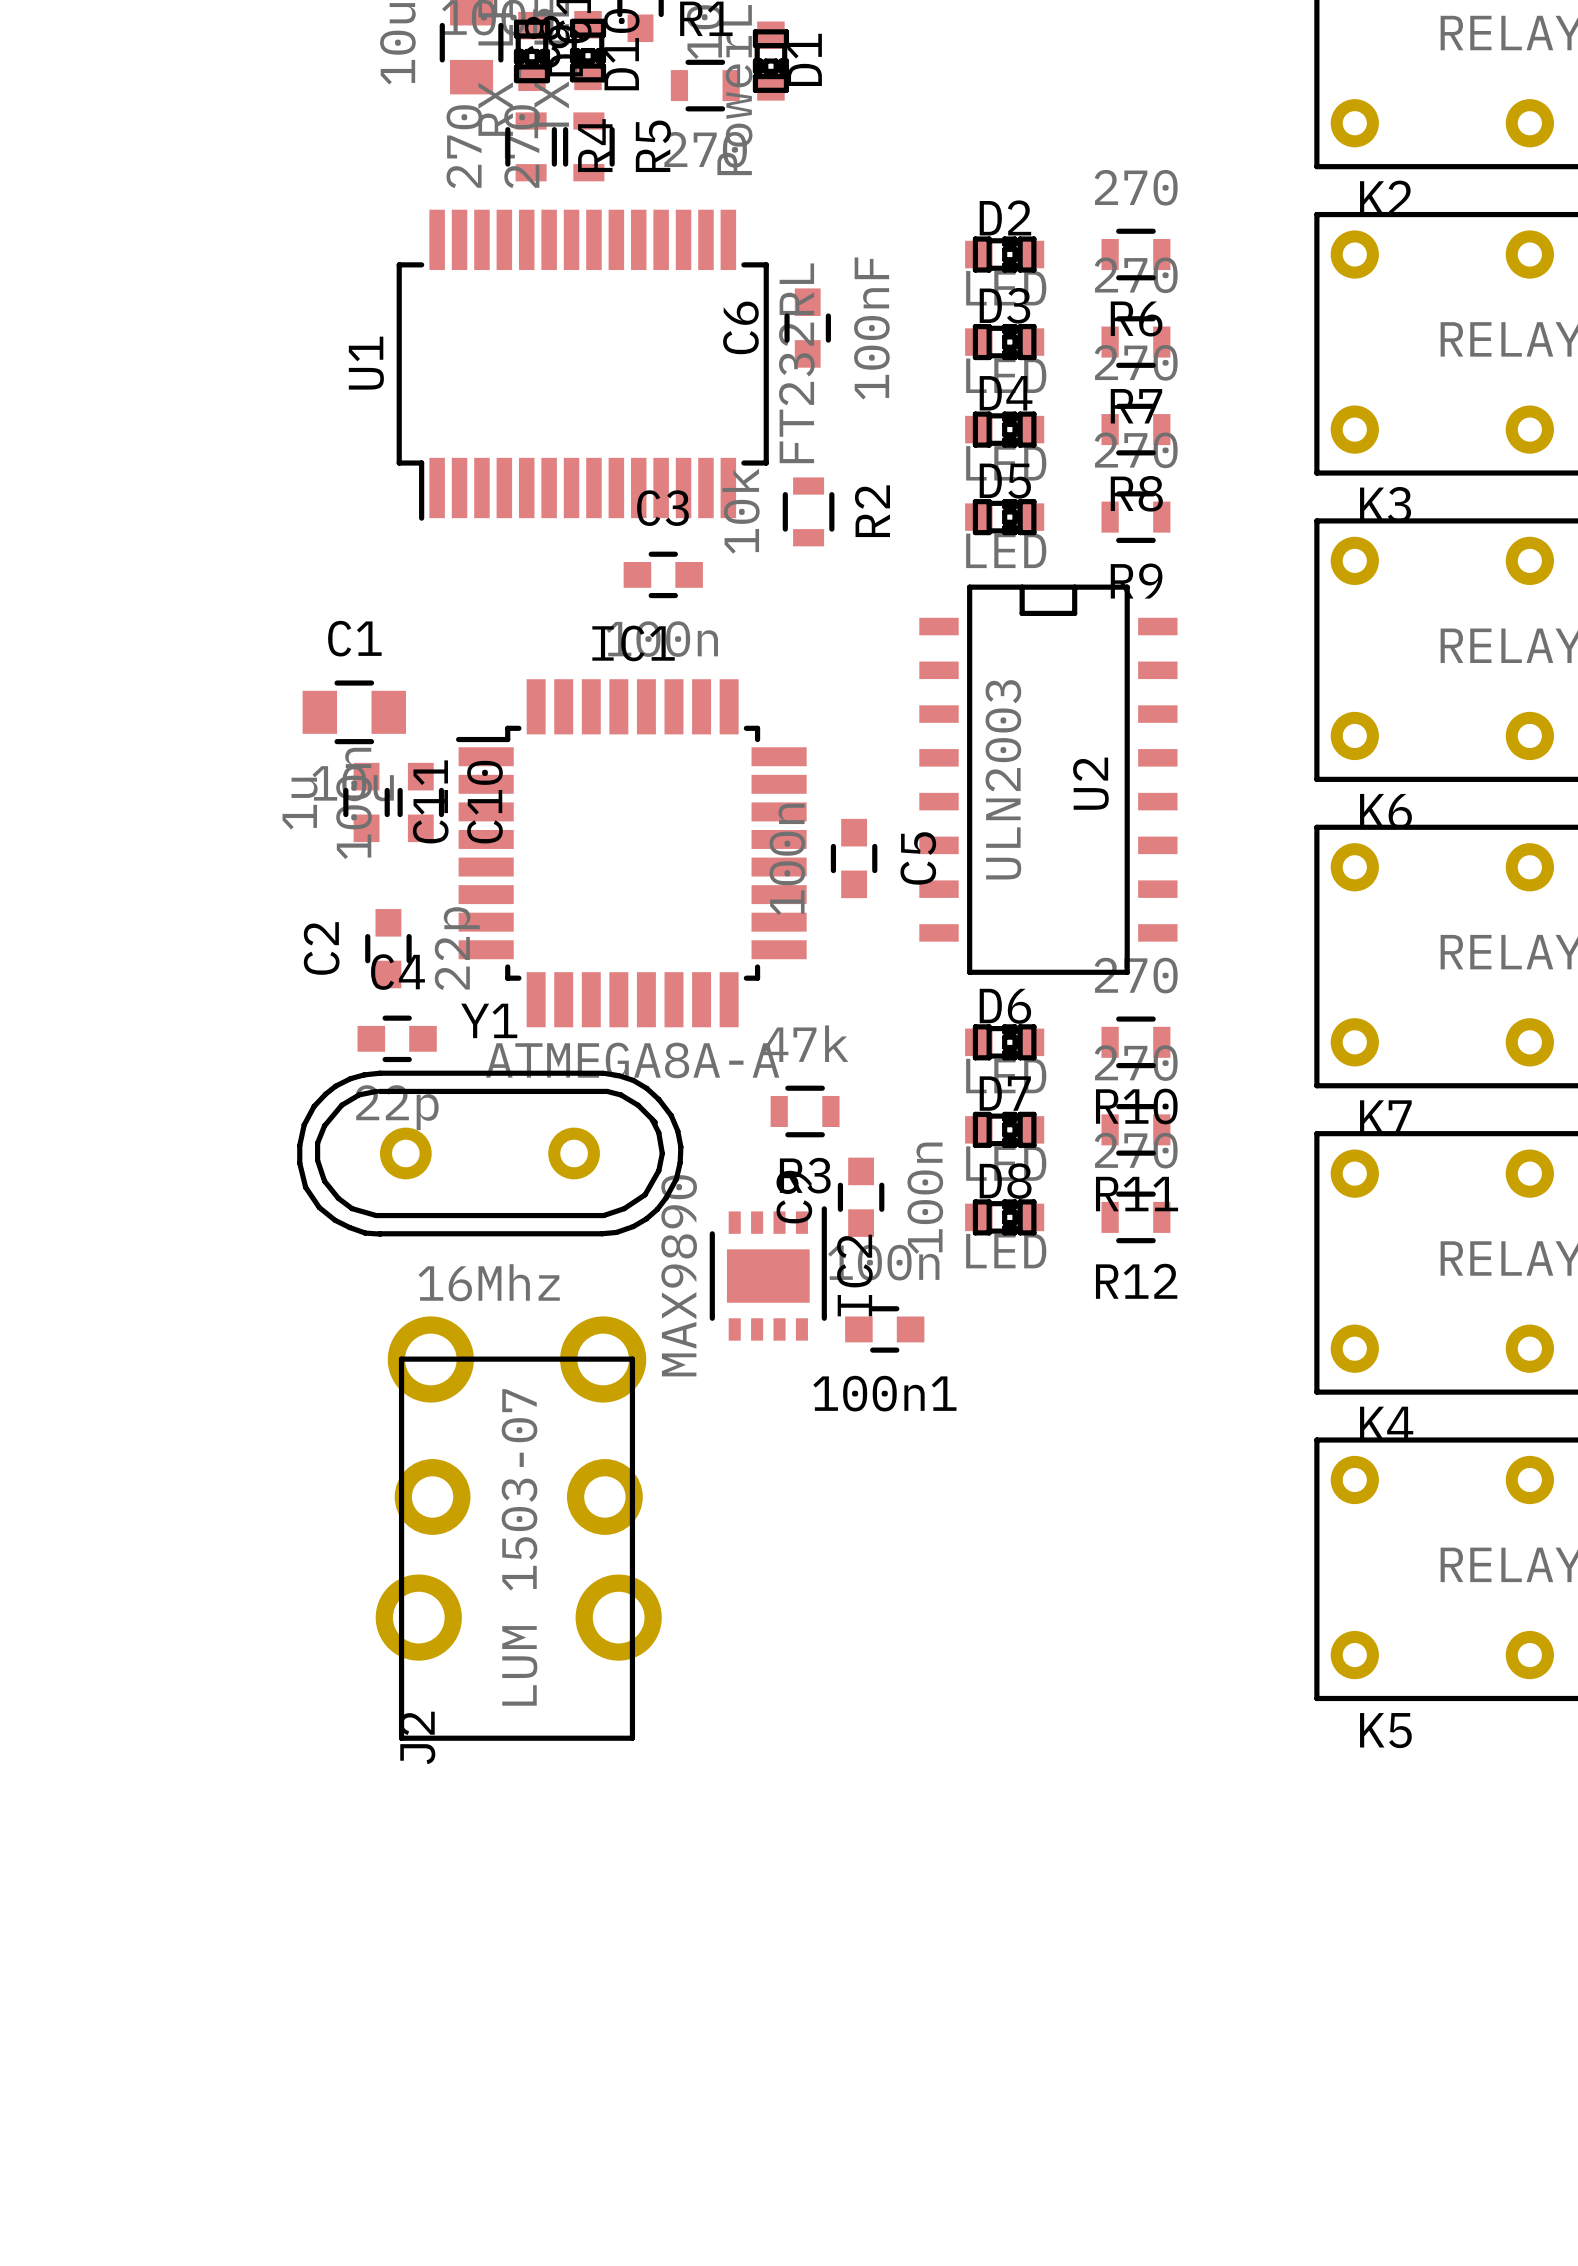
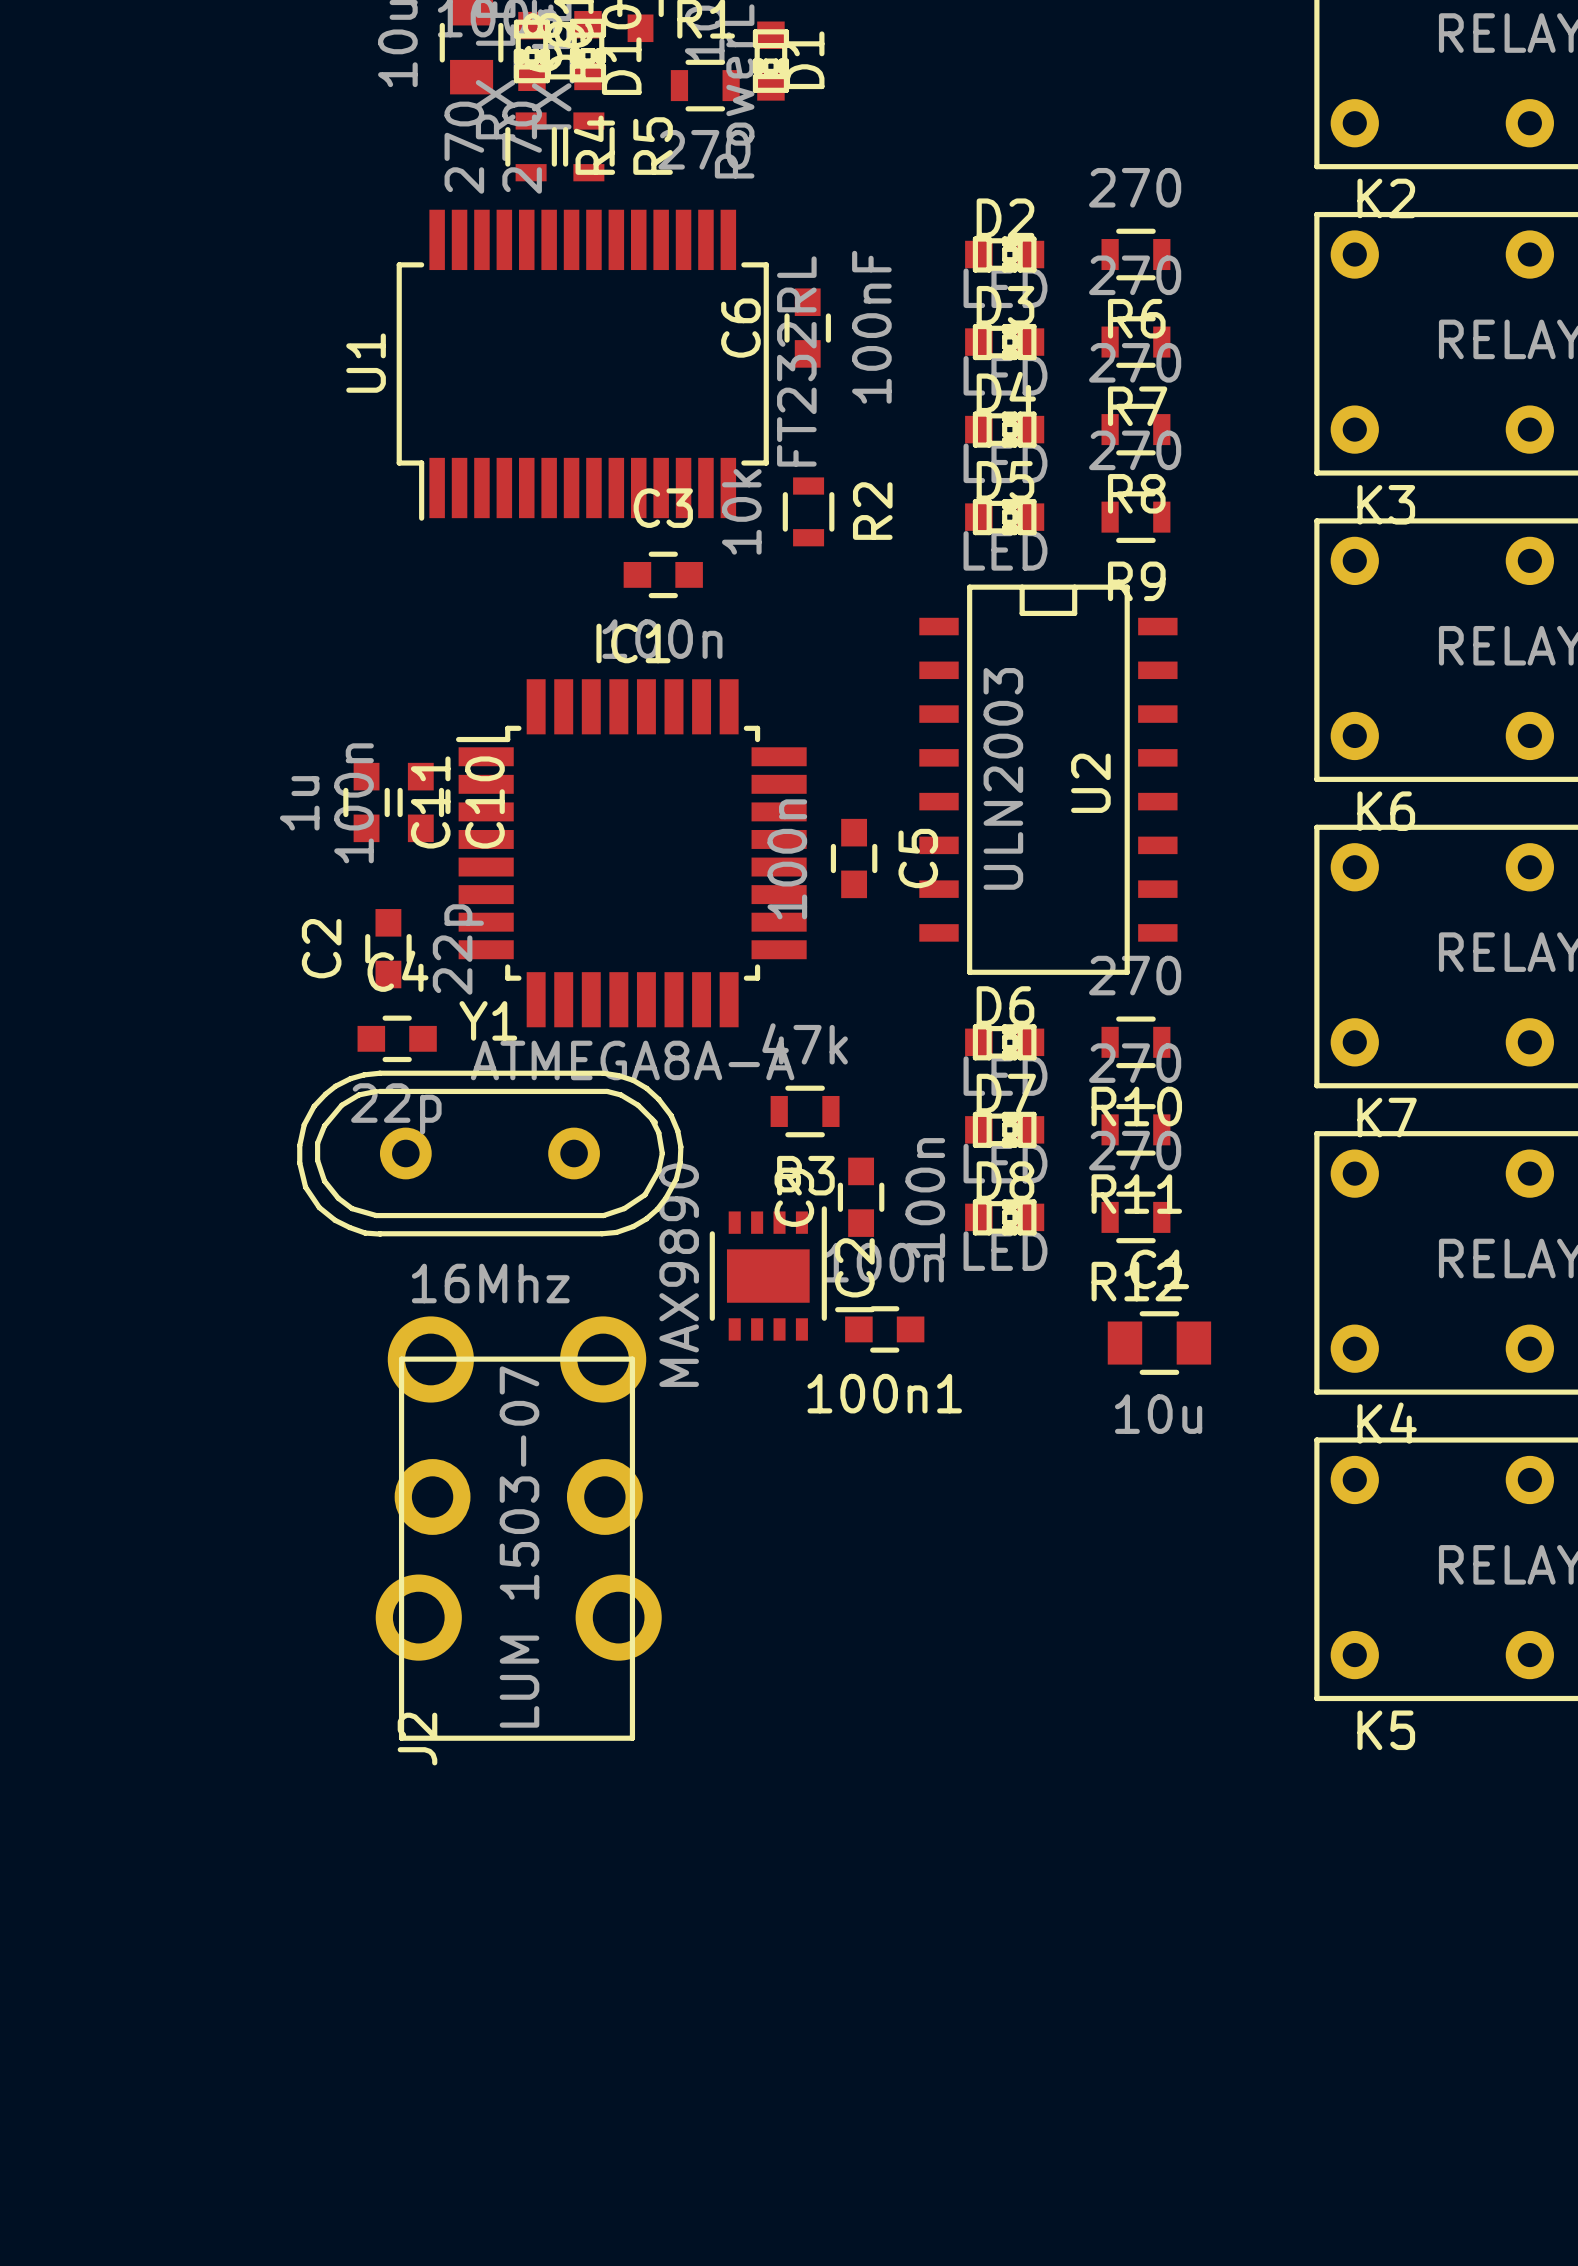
C1 position: (354, 712) -> (1159, 1343)

